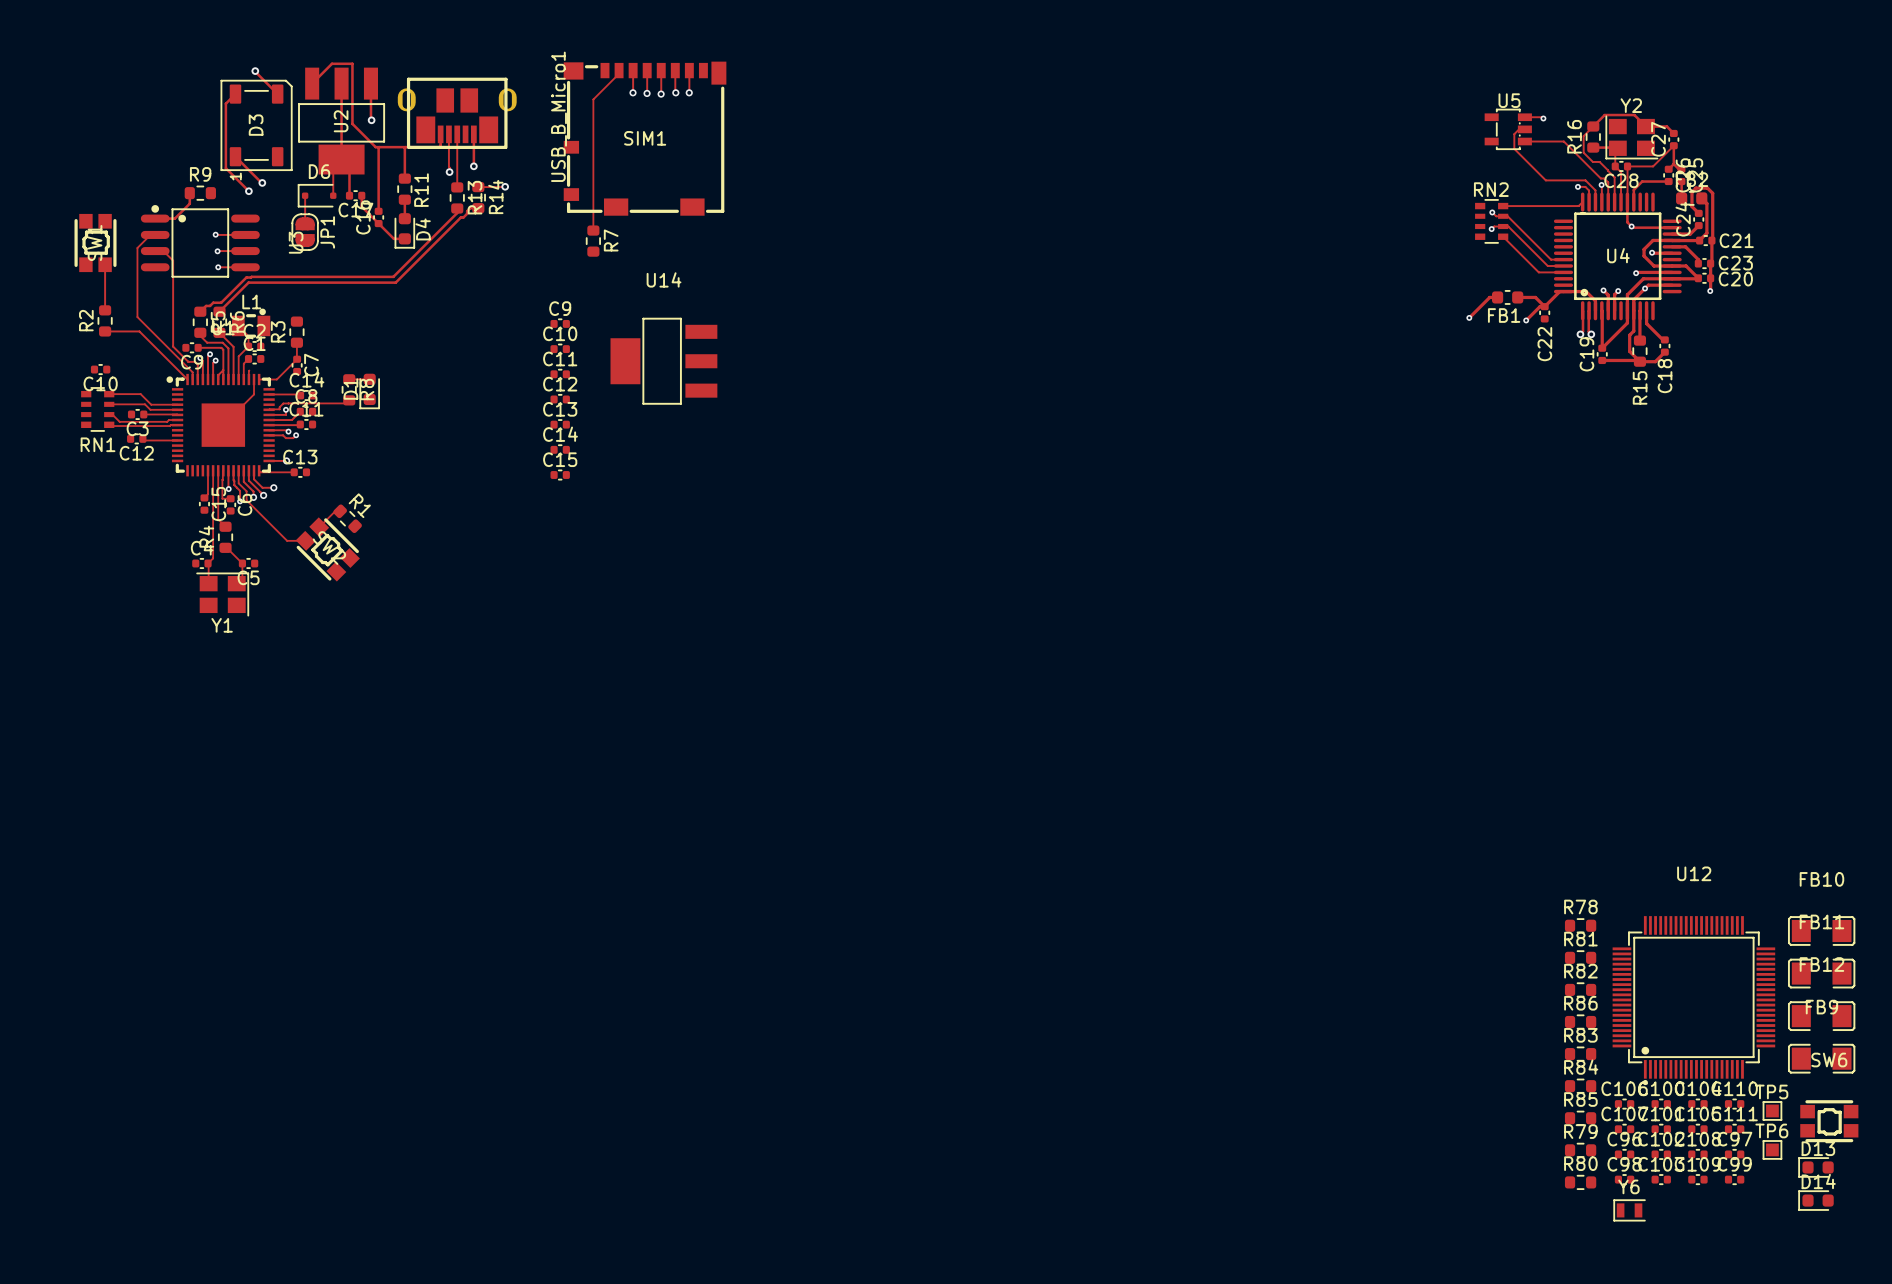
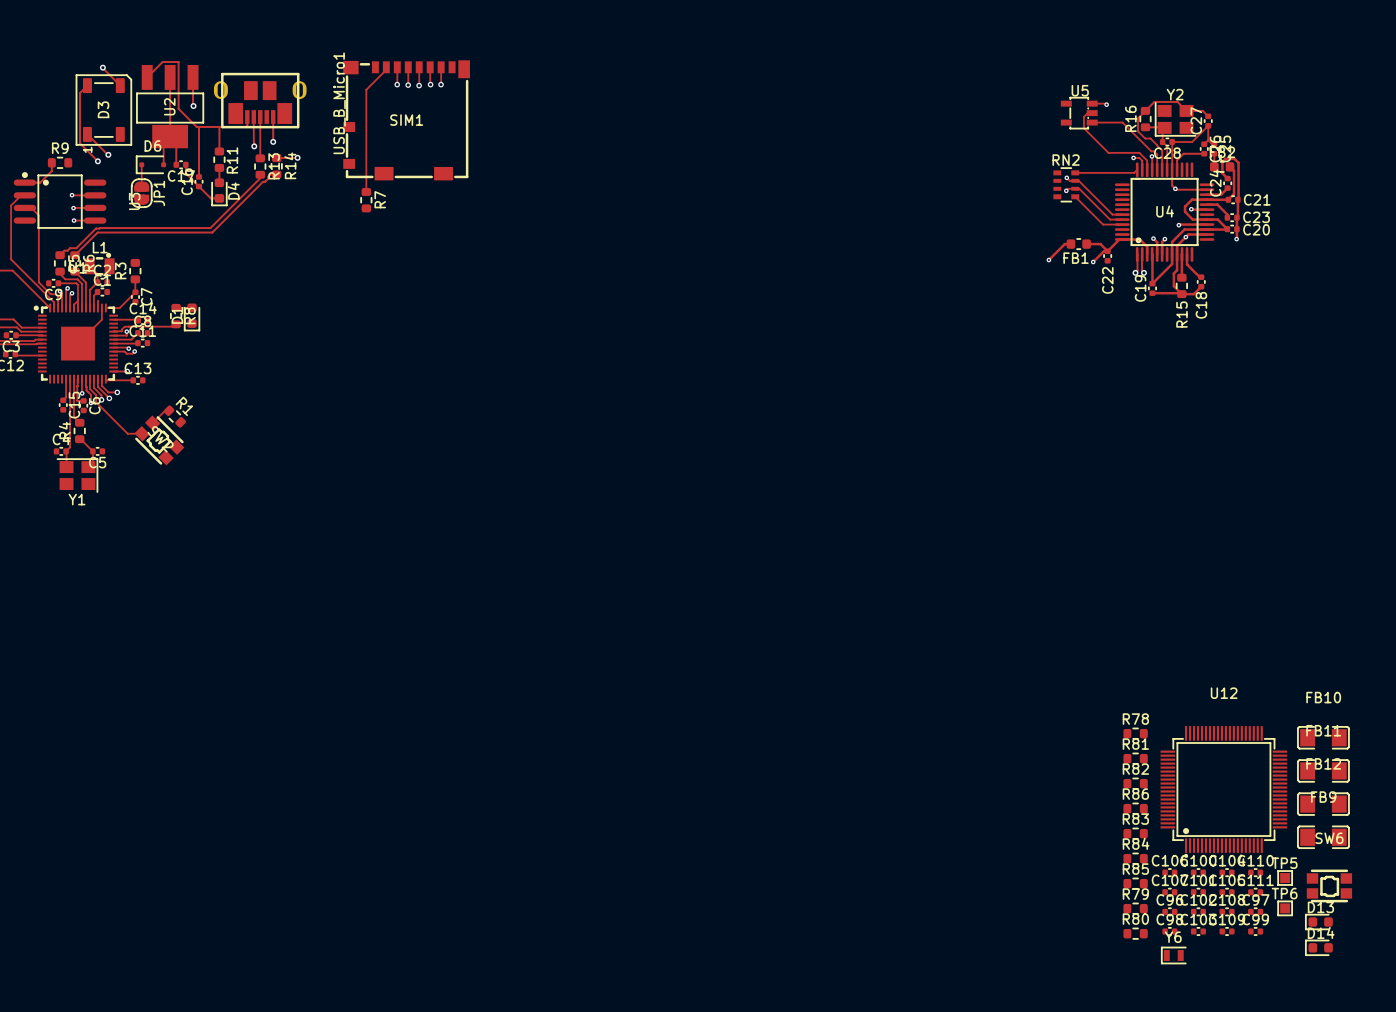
C9: (560, 323) -> none
C10: (560, 349) -> none
U14: (663, 361) -> none
C11: (560, 374) -> none
C12: (560, 399) -> none
C13: (560, 424) -> none
C14: (560, 449) -> none
C15: (560, 475) -> none

